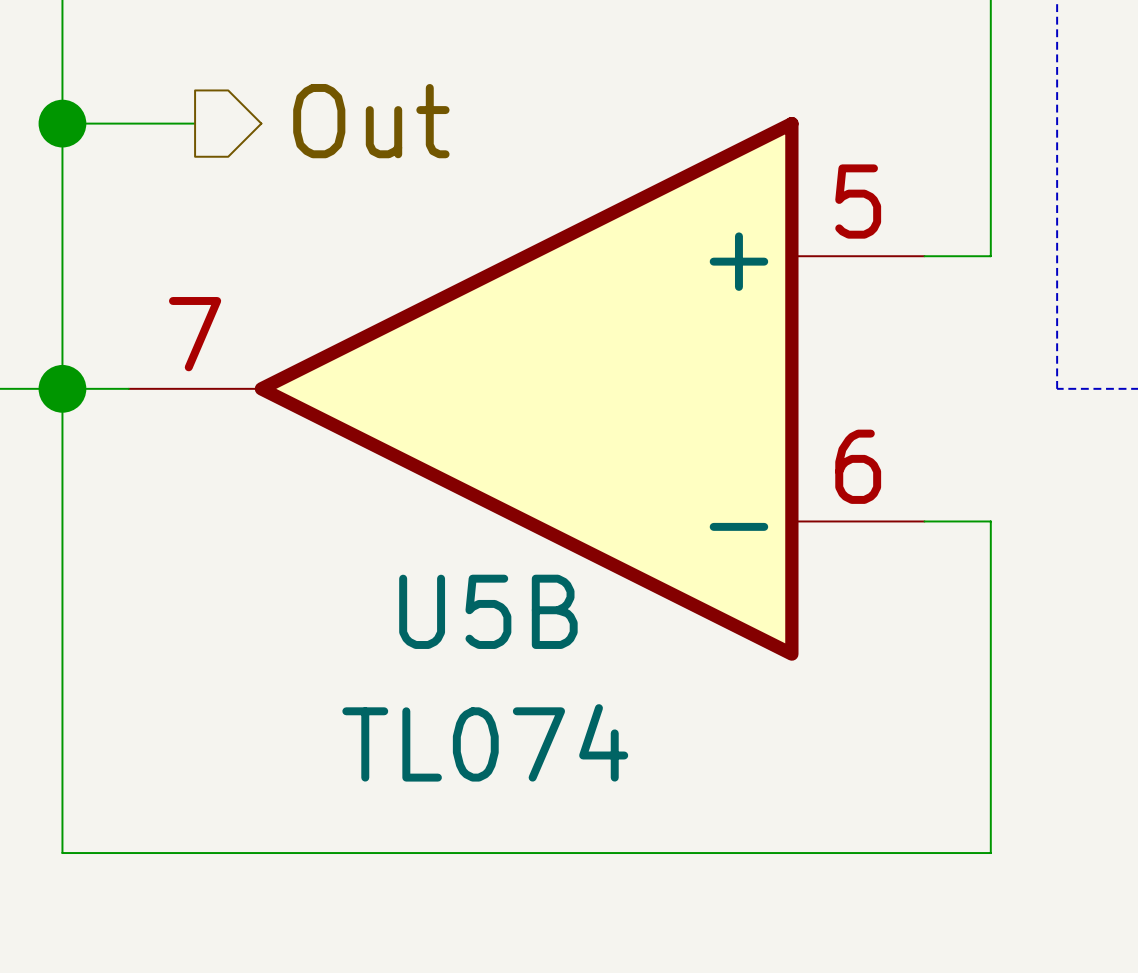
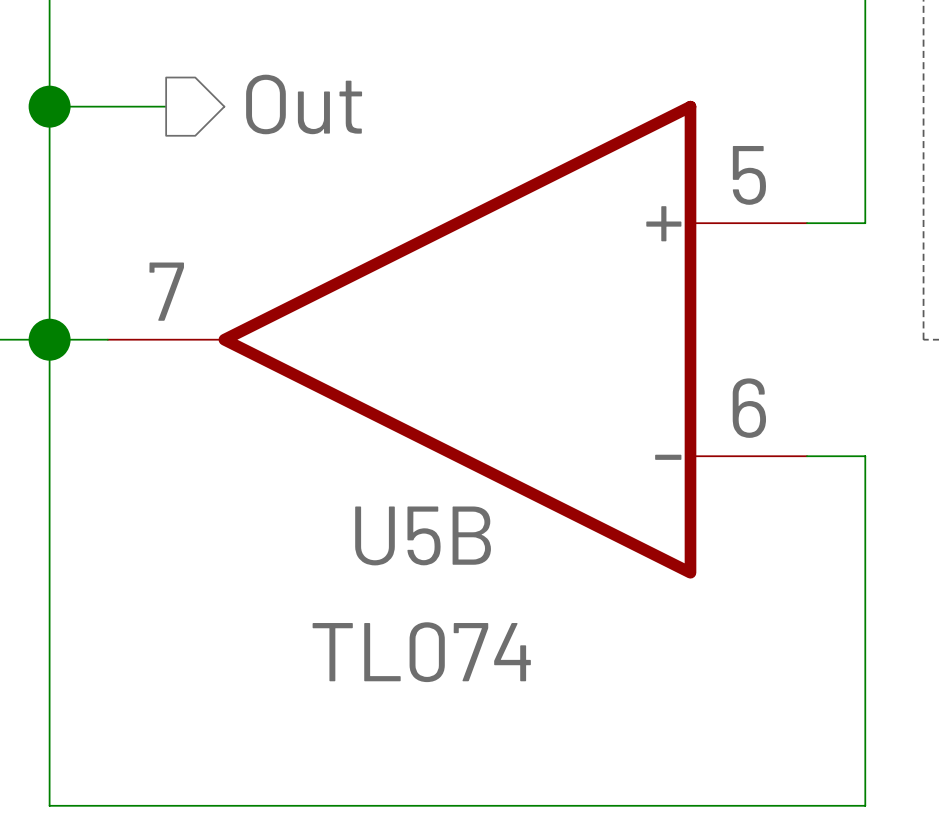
wire: (62, 853) (990, 853) -> (49, 747) (49, 805) (865, 805) (865, 747)

